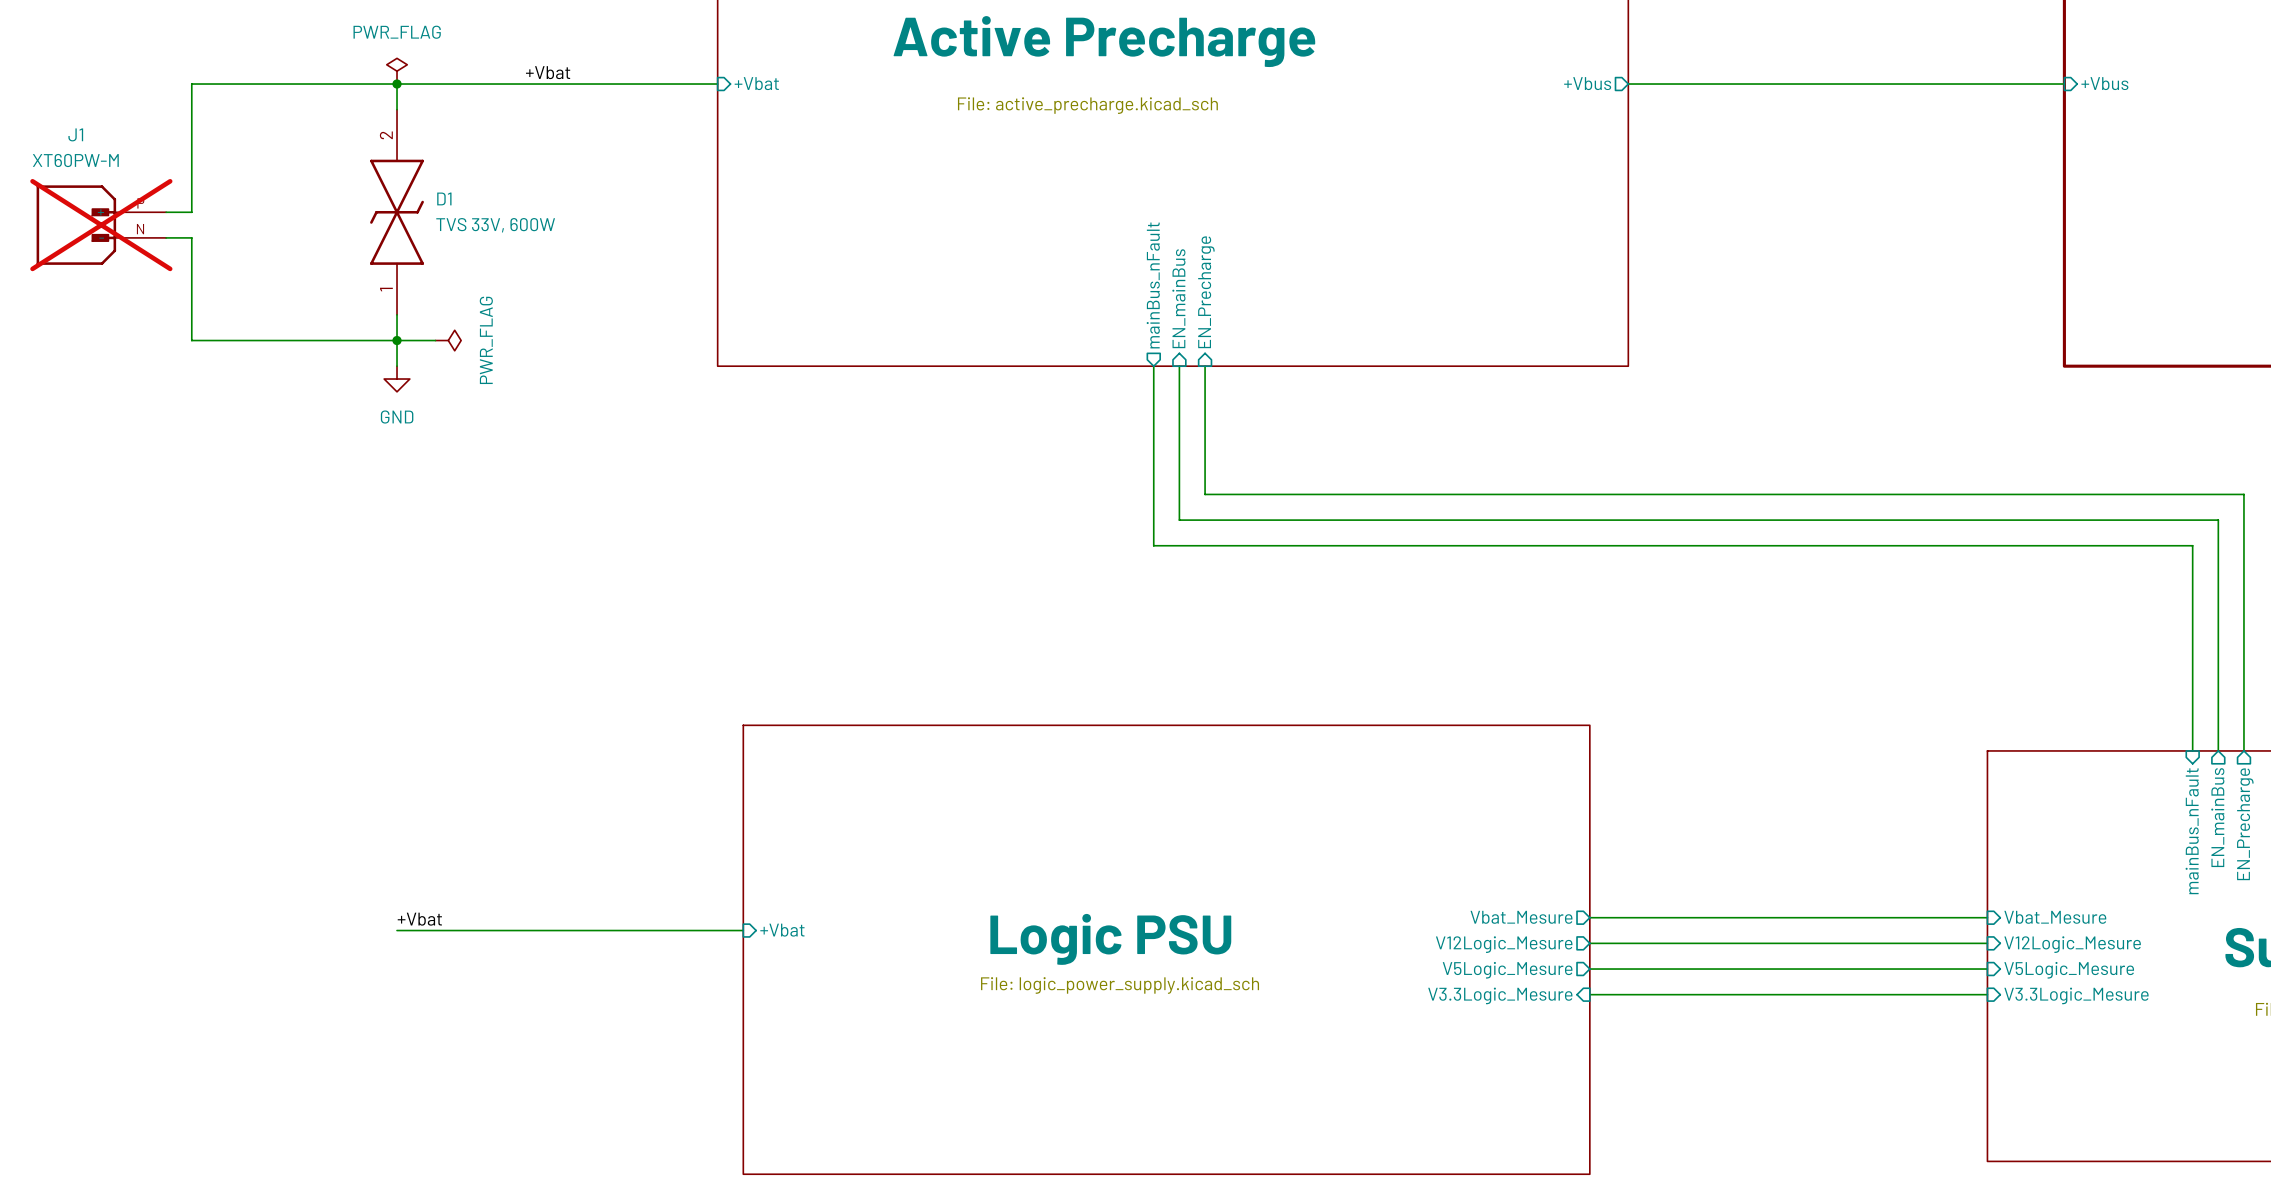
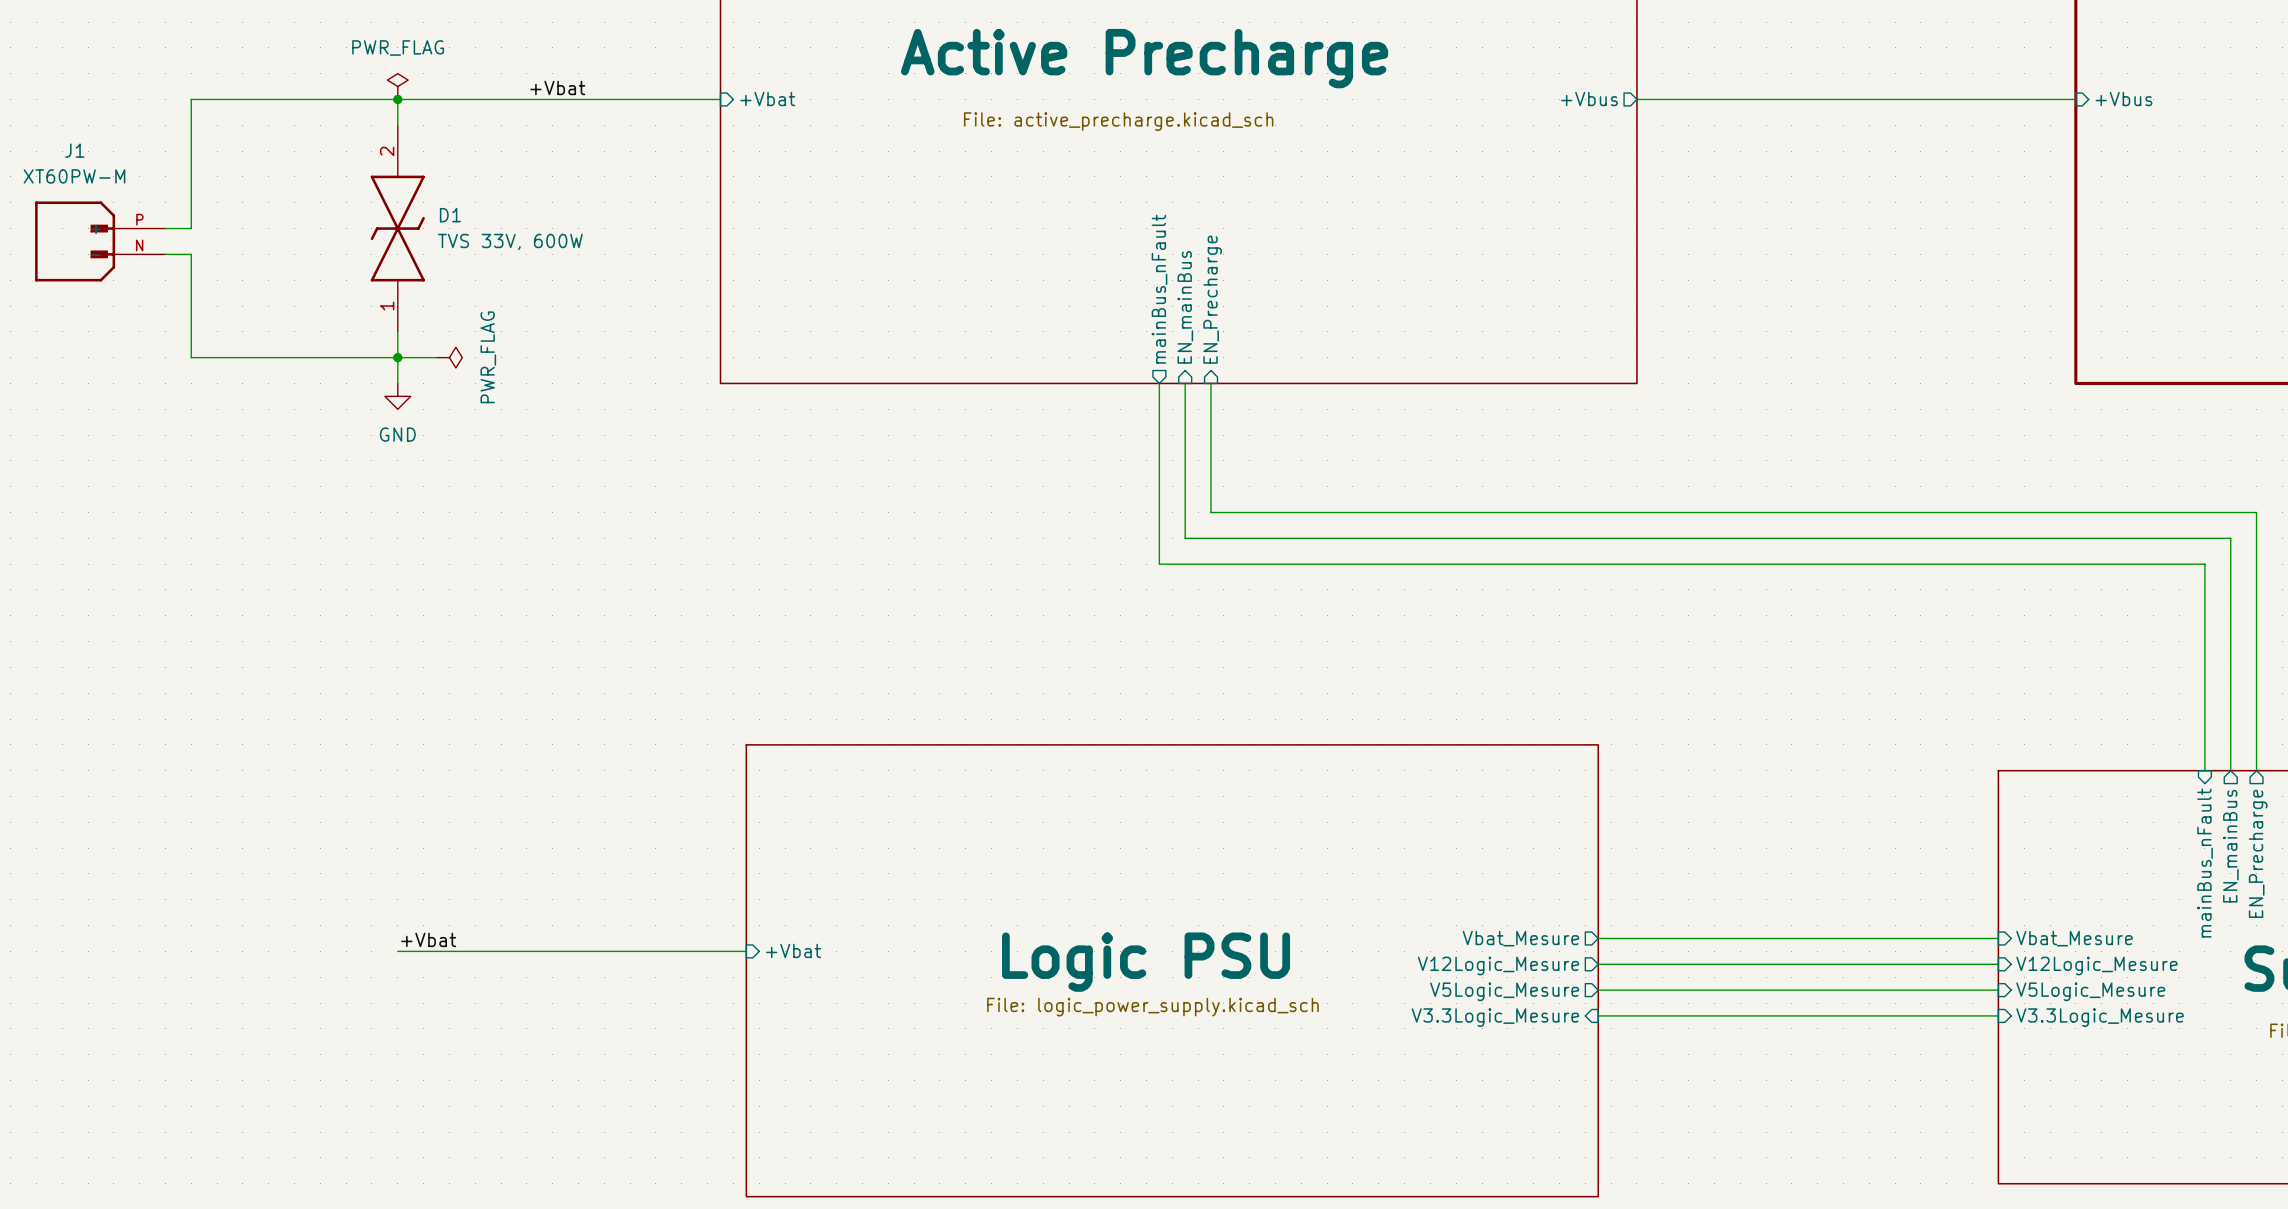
J1 do-not-place cross: (101, 225) -> none

